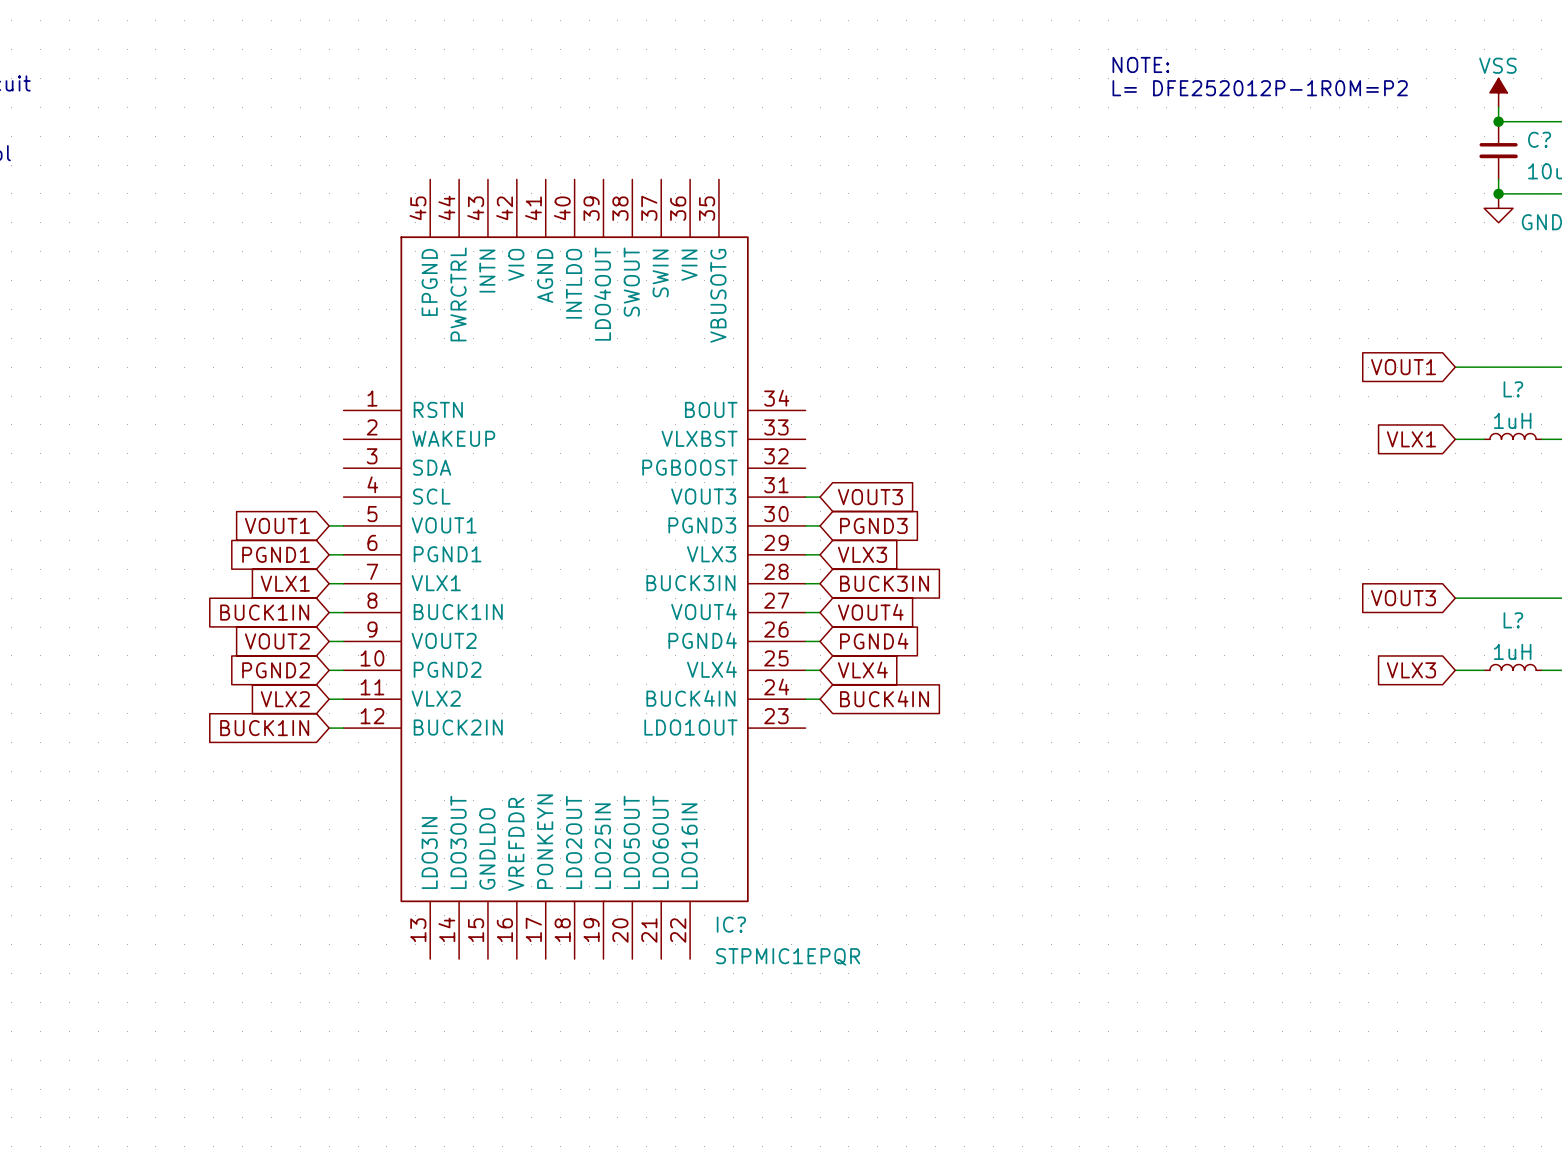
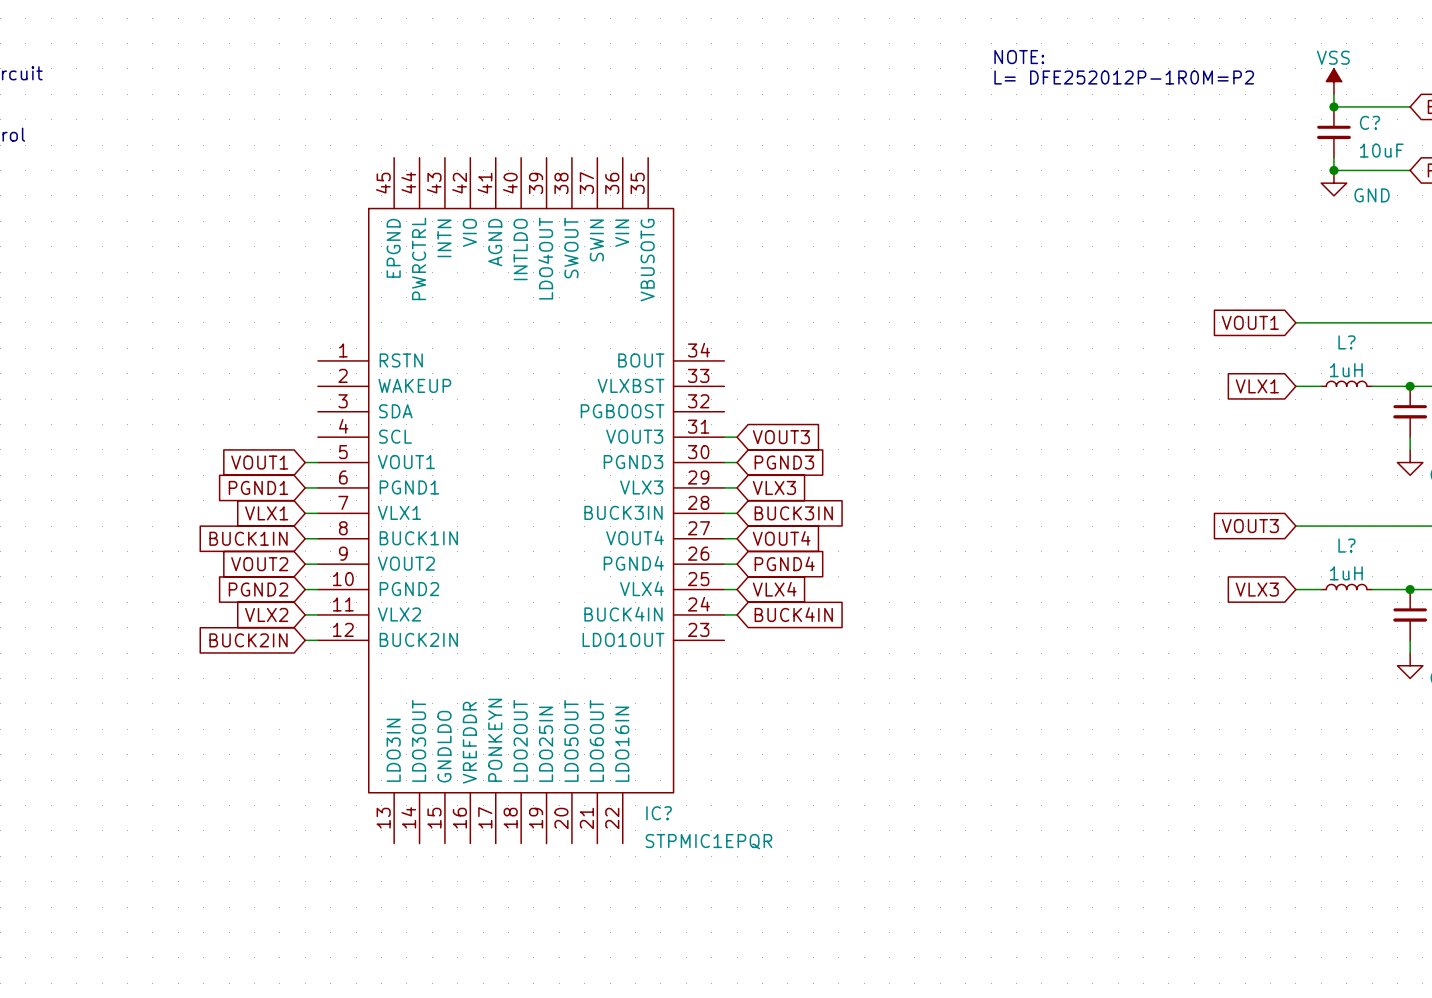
global label: BUCK1IN (264, 728) -> BUCK2IN (248, 640)

